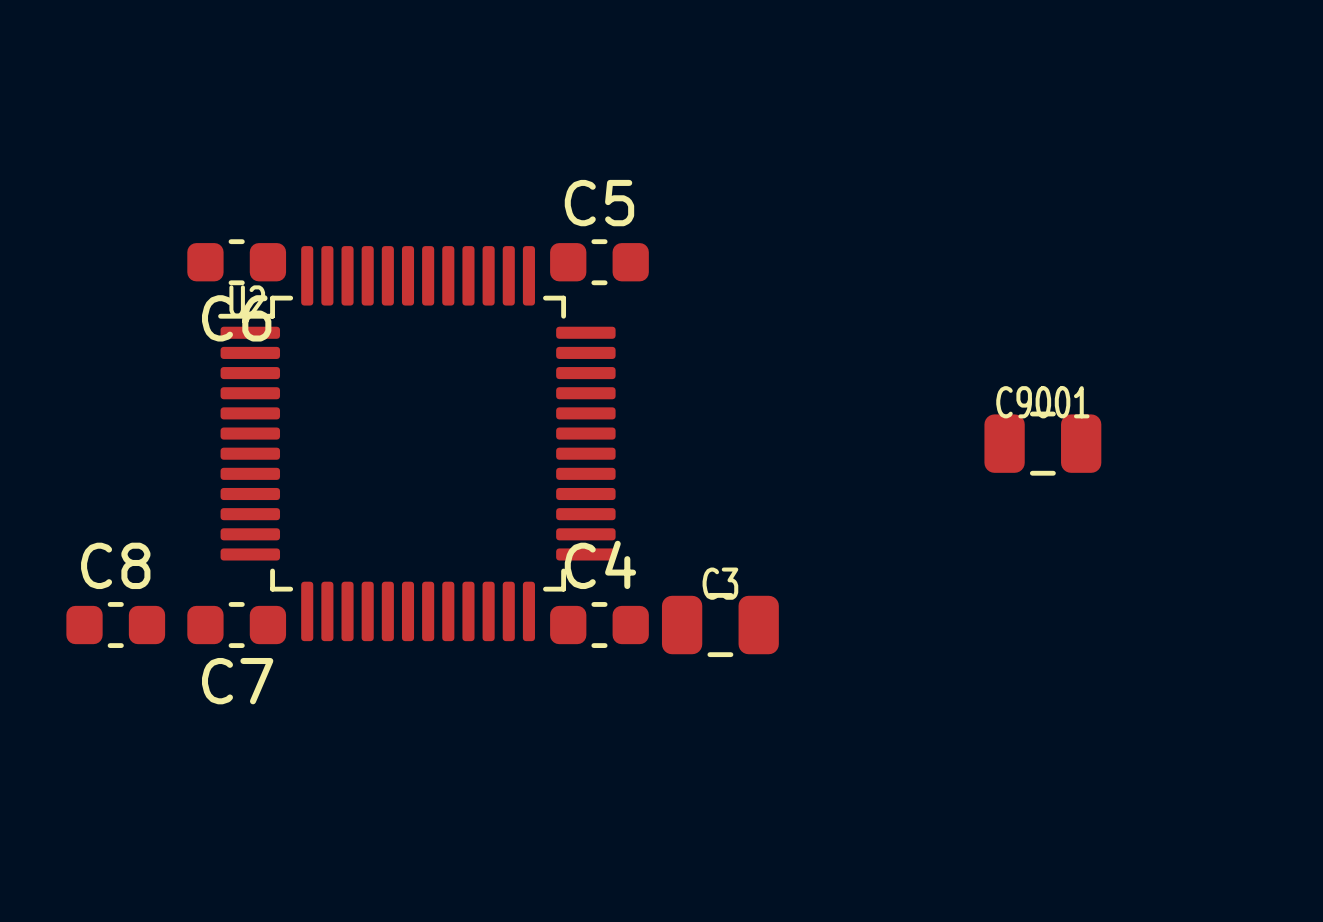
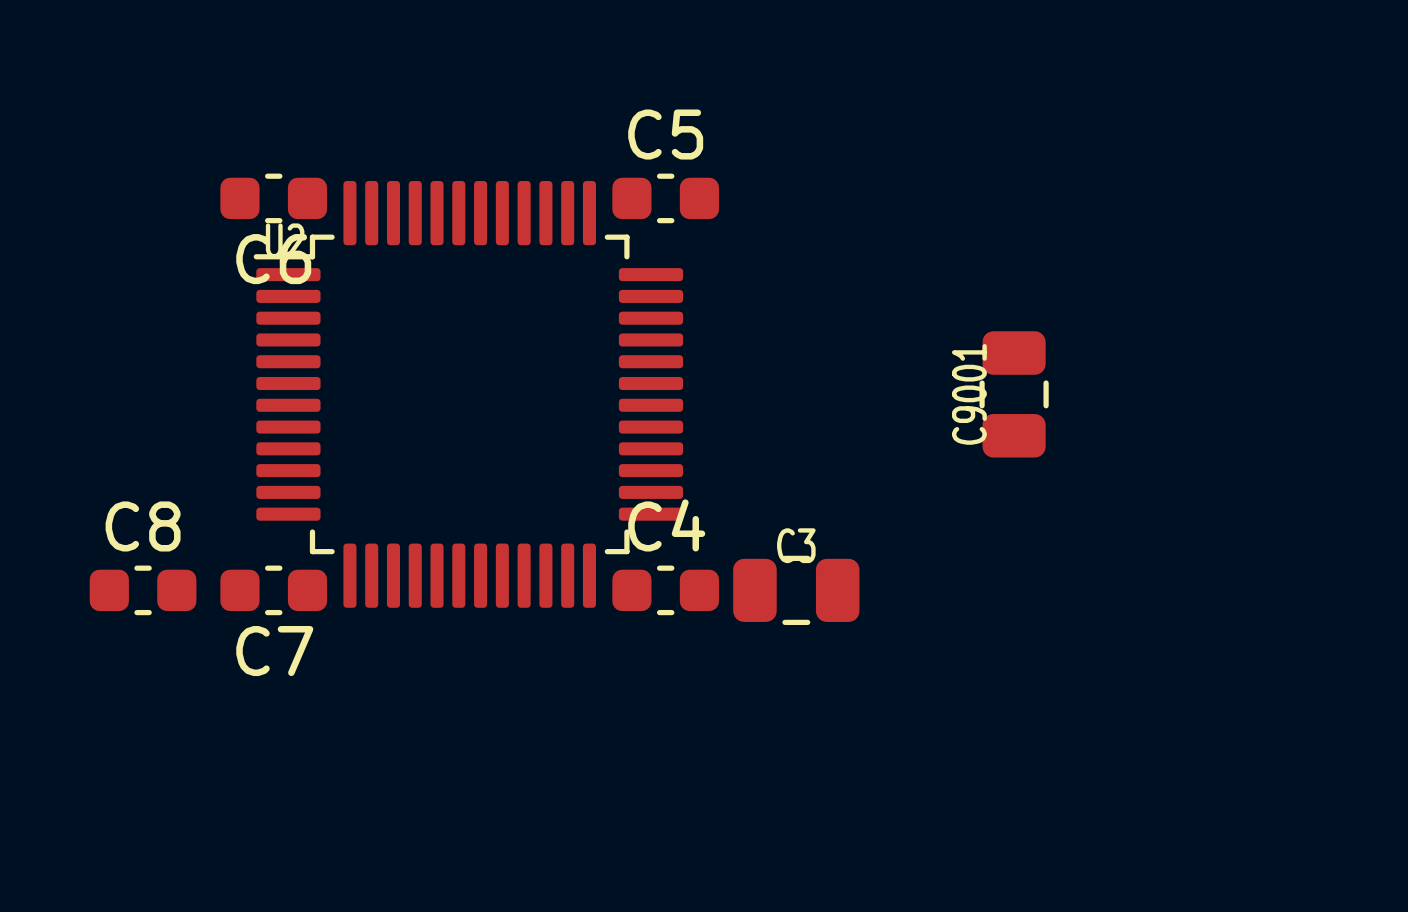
C9001 rotation: 0° (1042, 443) -> 90° clockwise (1014, 394)
C9001 position: (1042, 443) -> (1014, 394)

